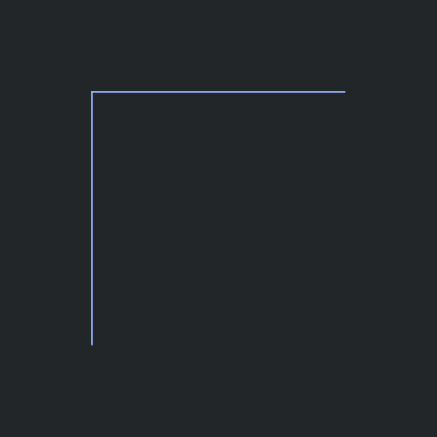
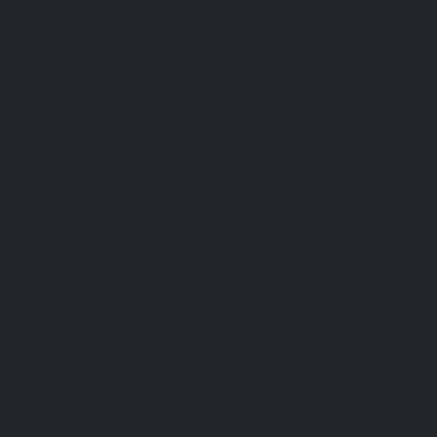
line: (344, 91) (91, 91) (91, 344) -> none

